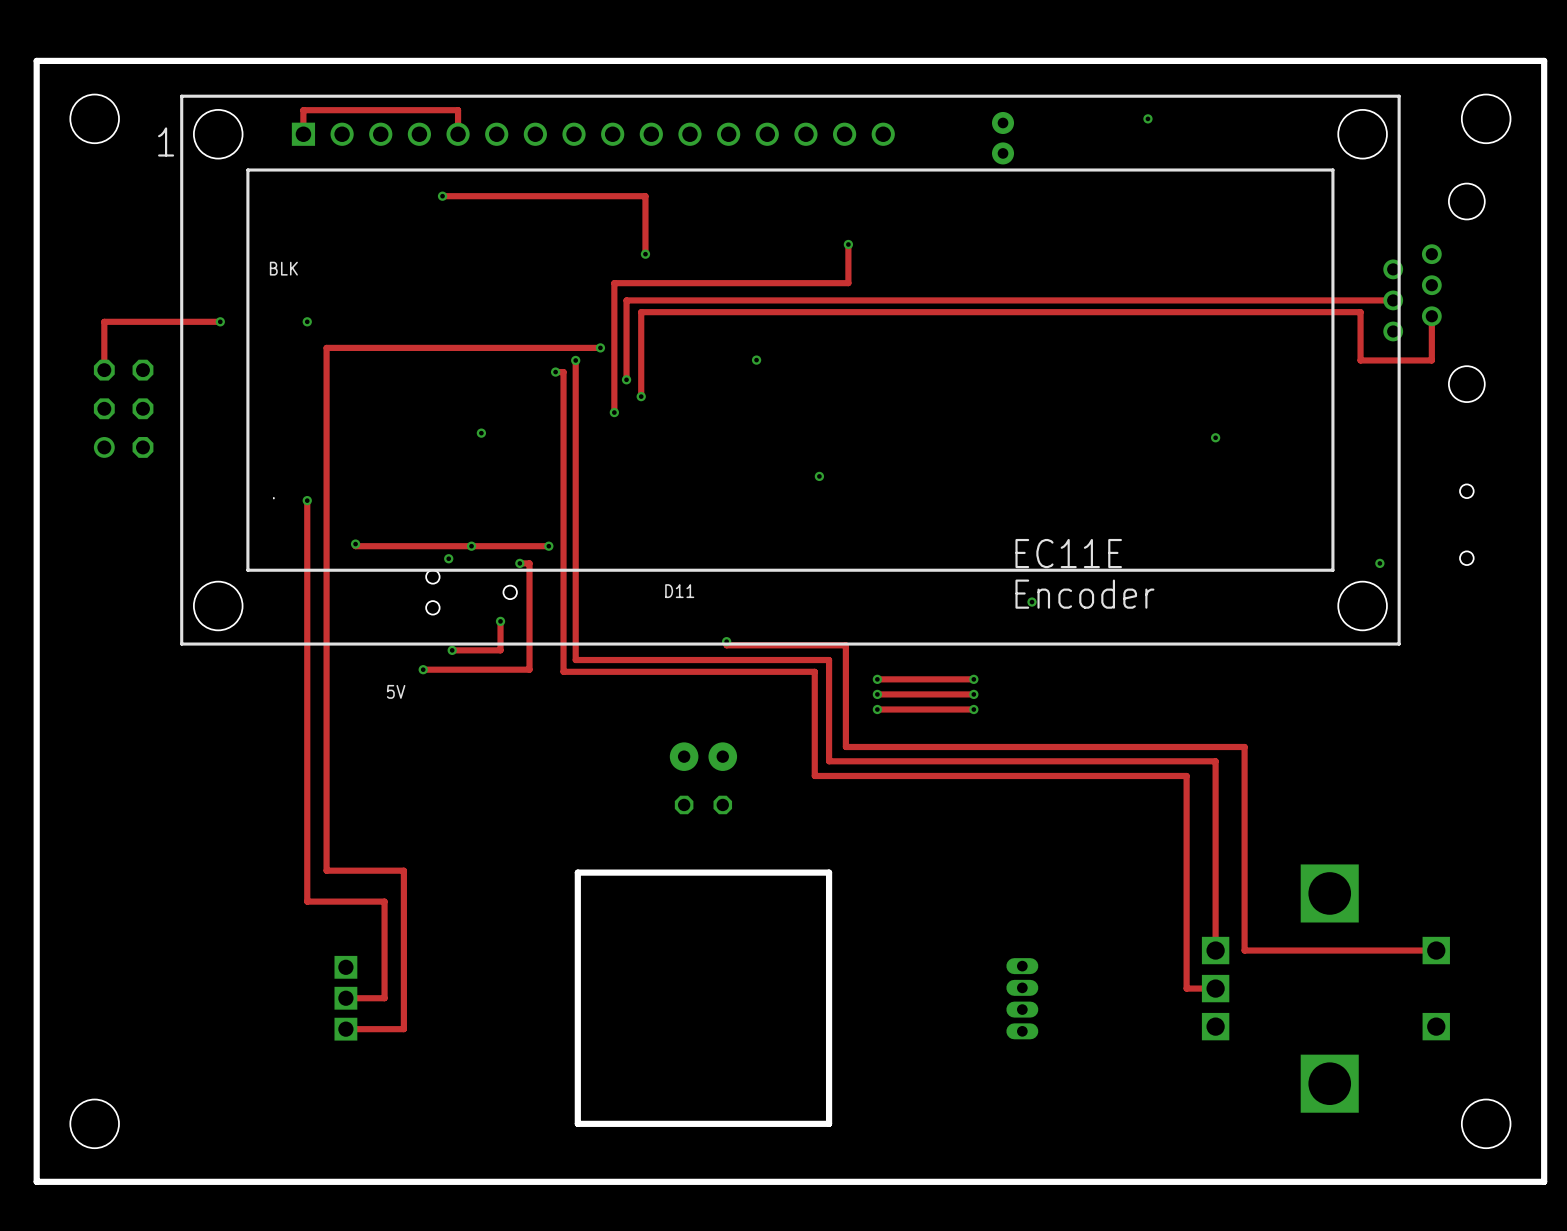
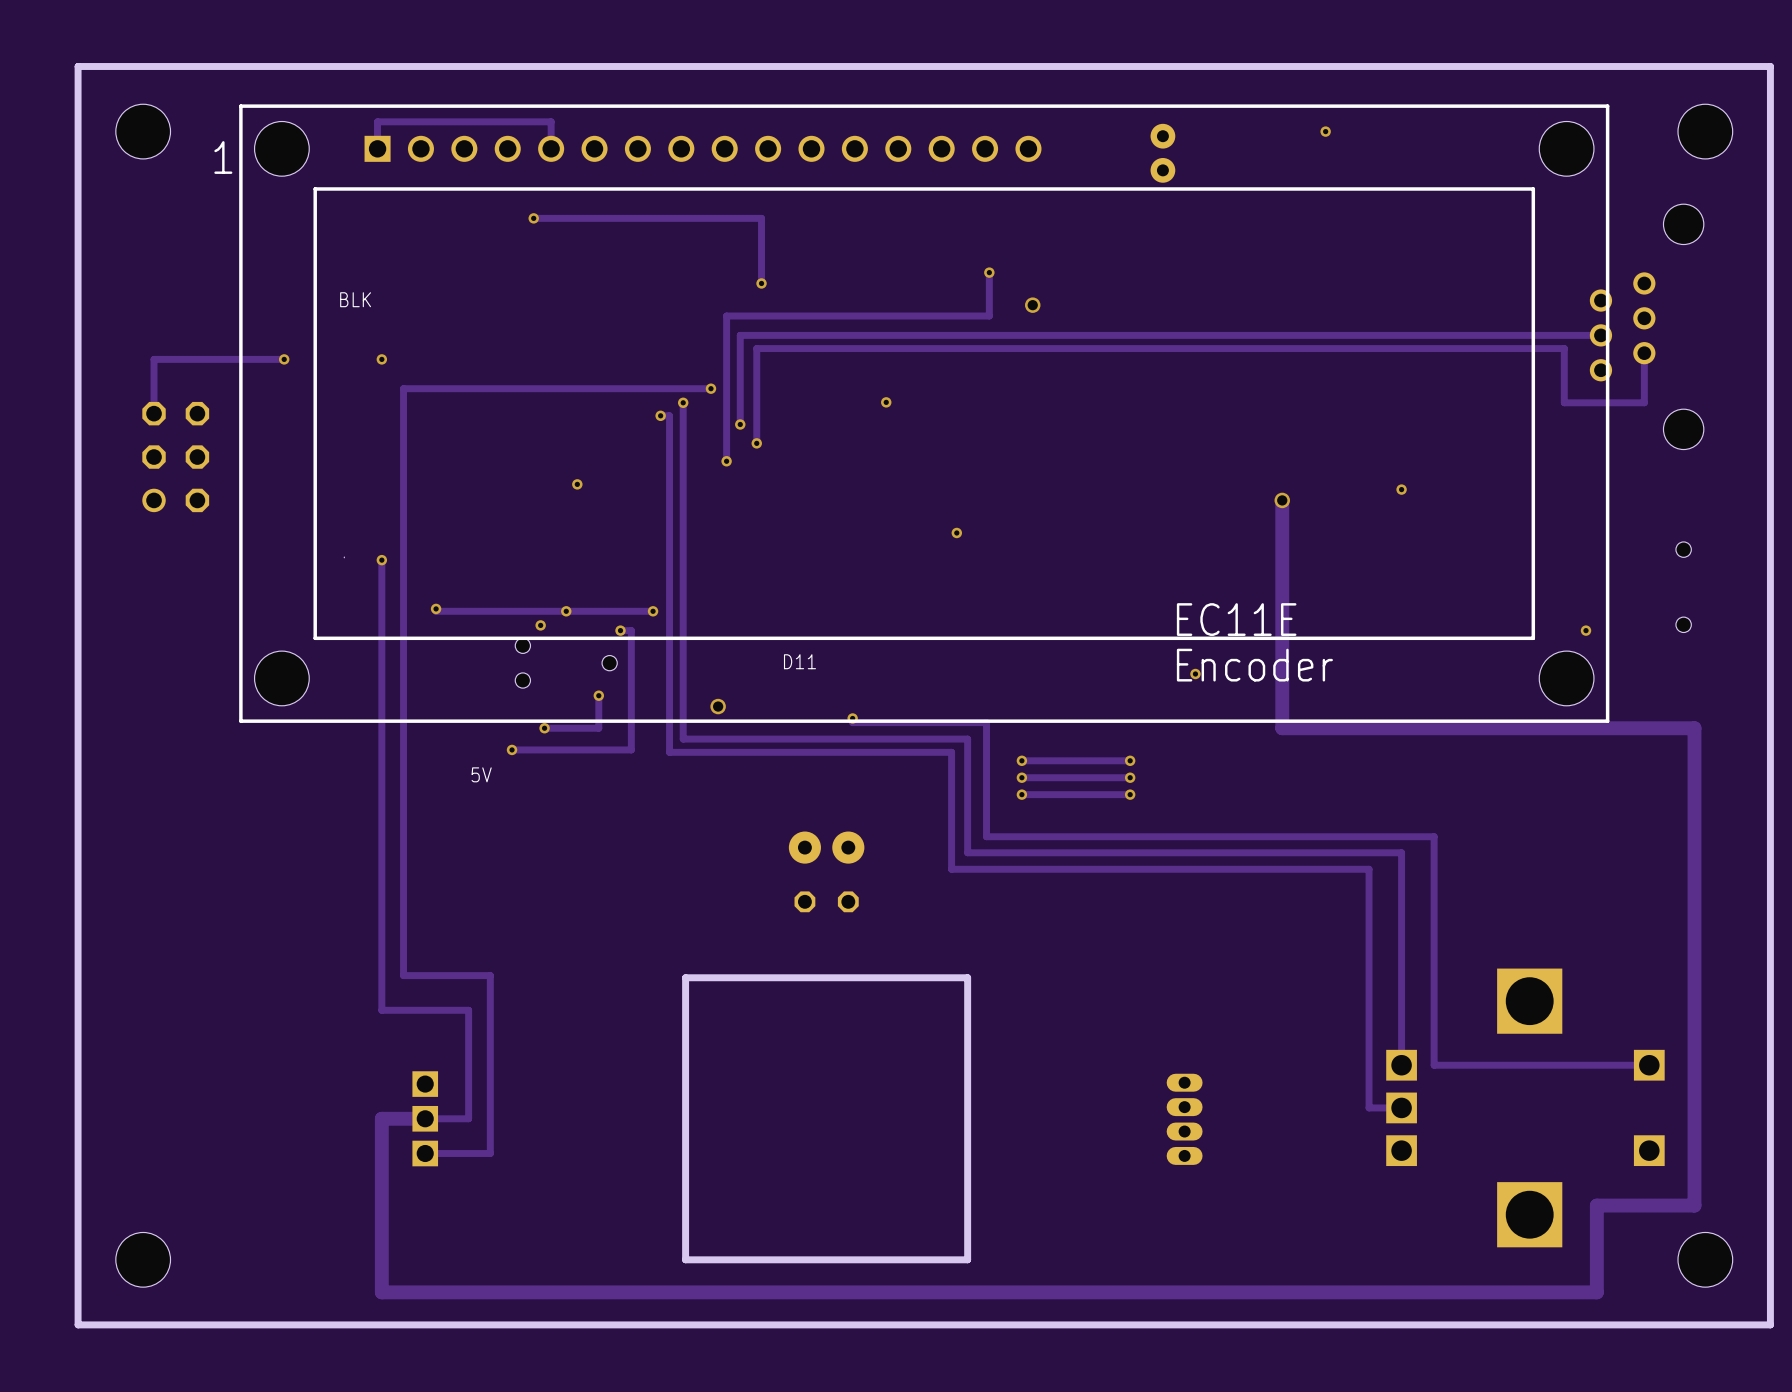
via: none -> (1032, 305)
track: none -> (1282, 500) (1282, 728) (1694, 728) (1694, 1205) (1596, 1205) (1596, 1292) (381, 1292) (381, 1118) (425, 1118)
via: none -> (1282, 500)
via: none -> (718, 706)

